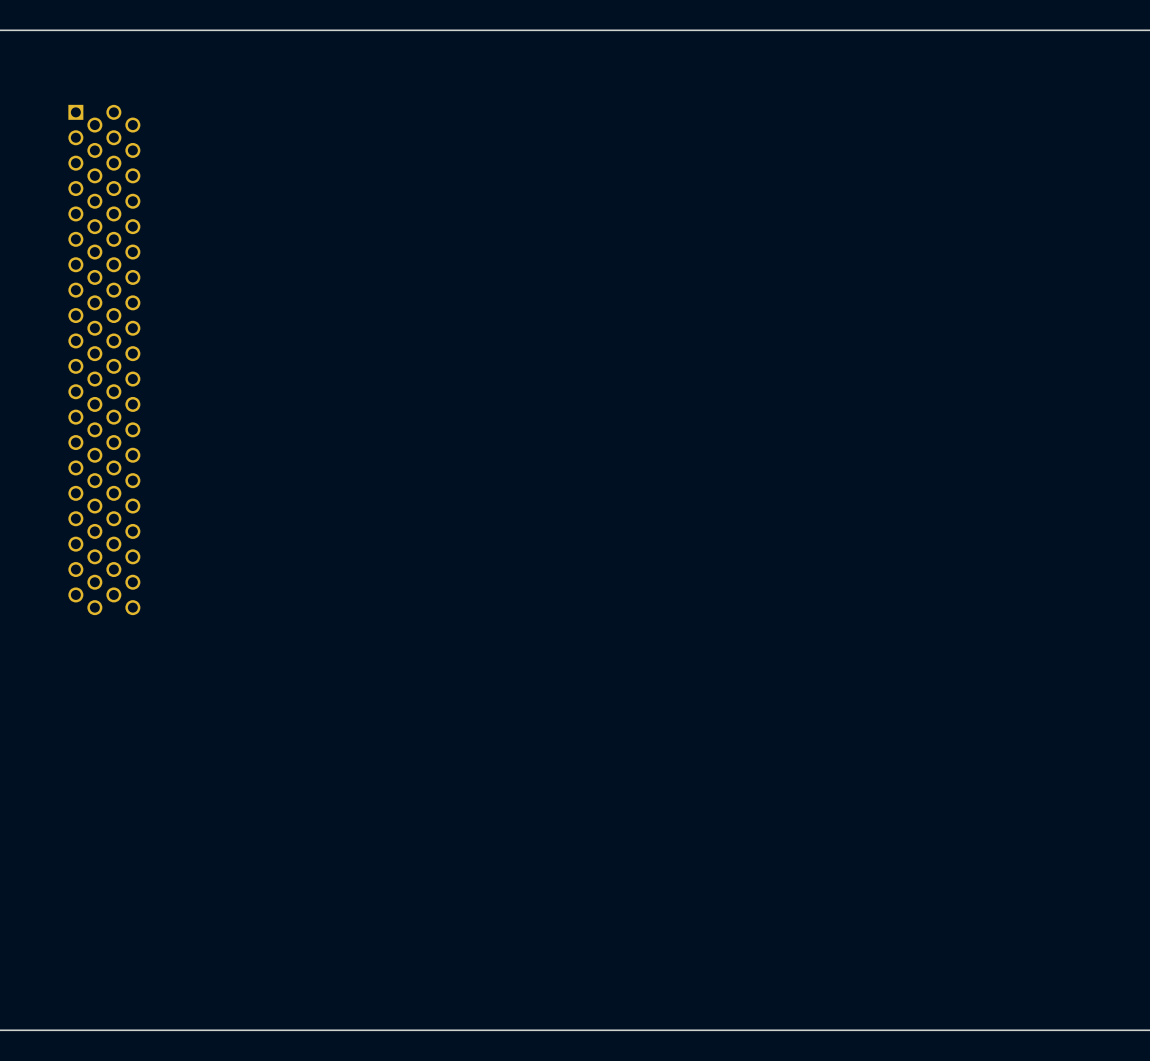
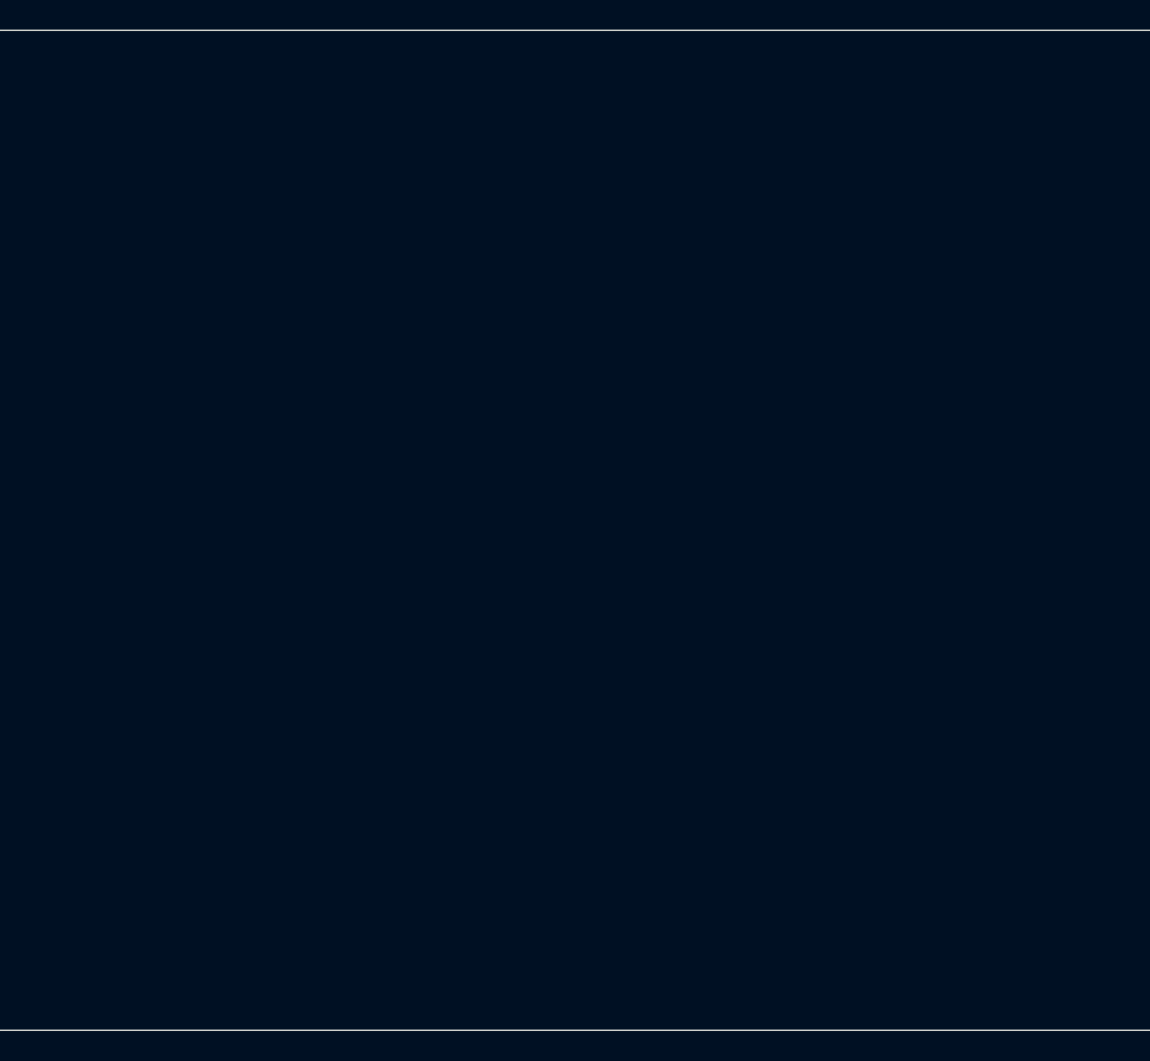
part: (104, 359) -> none

